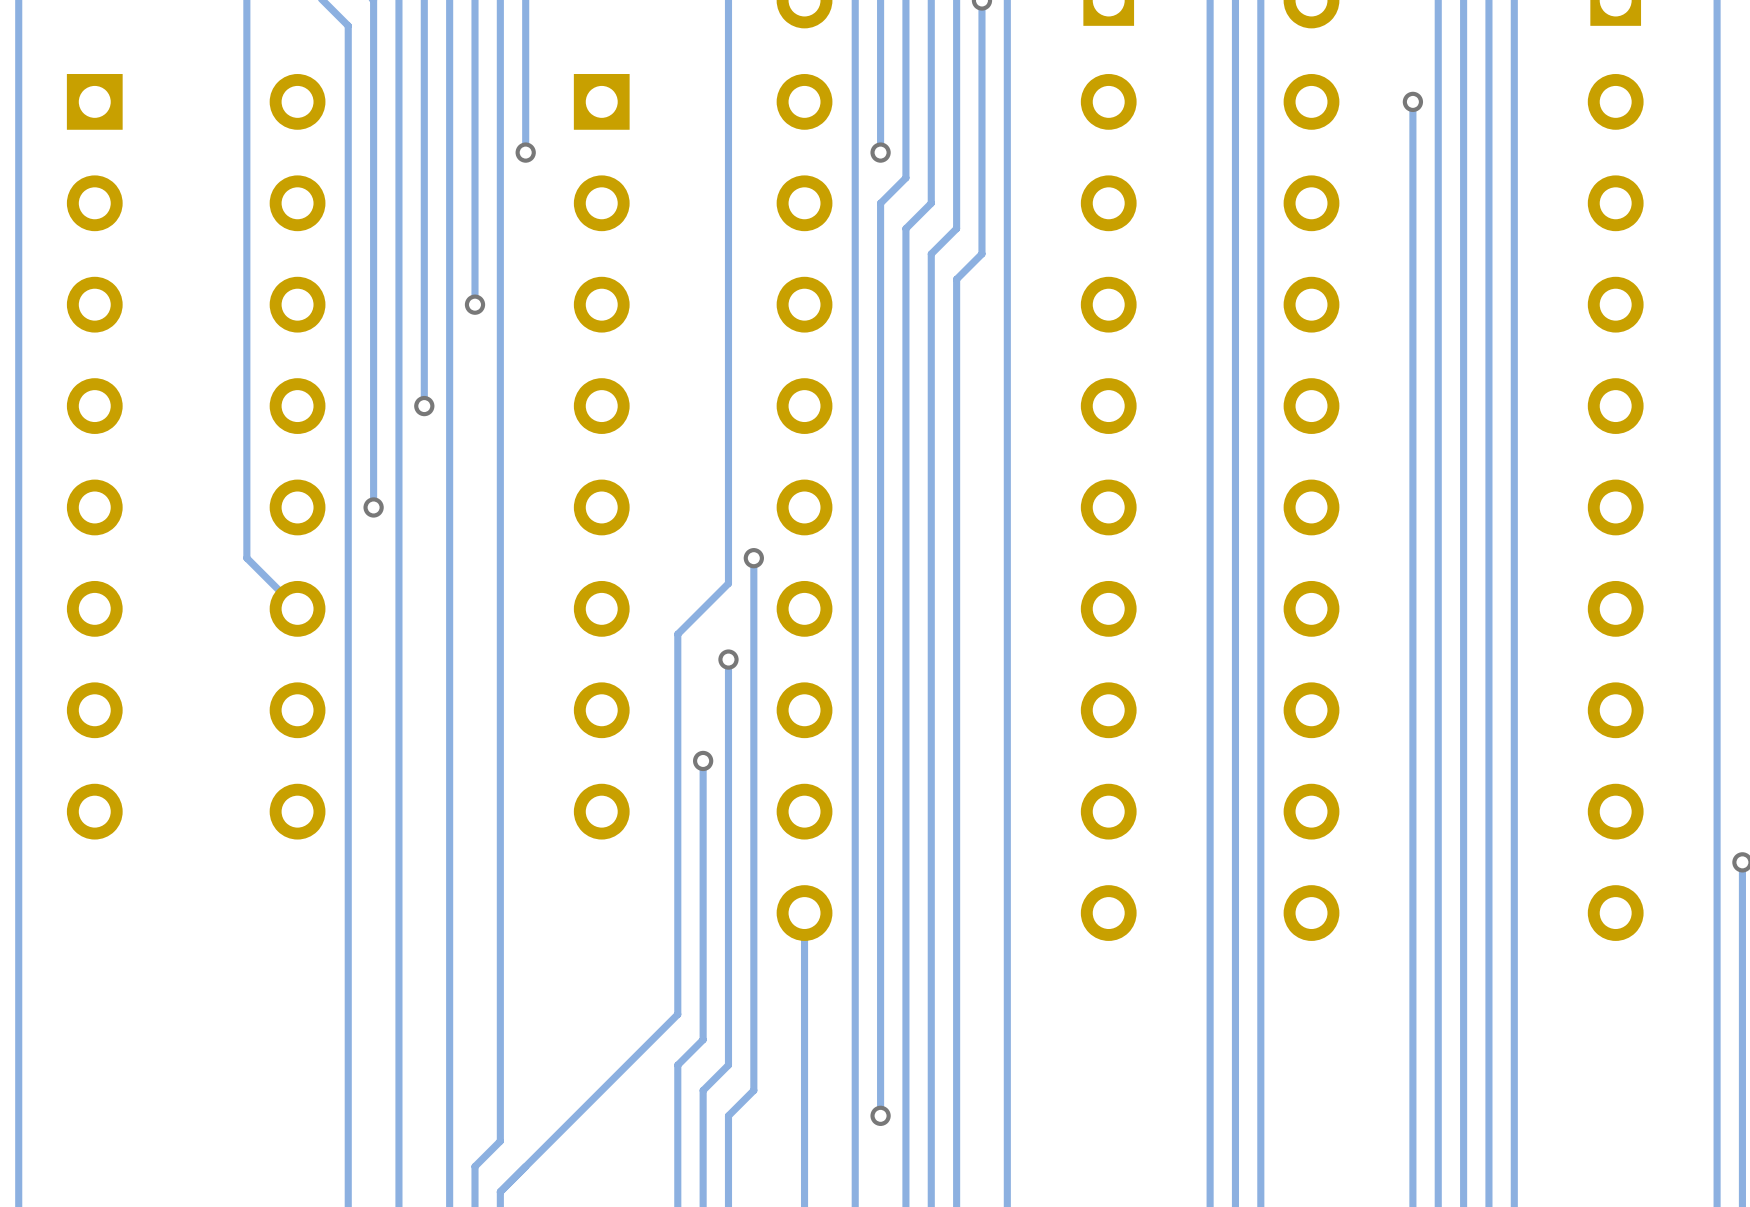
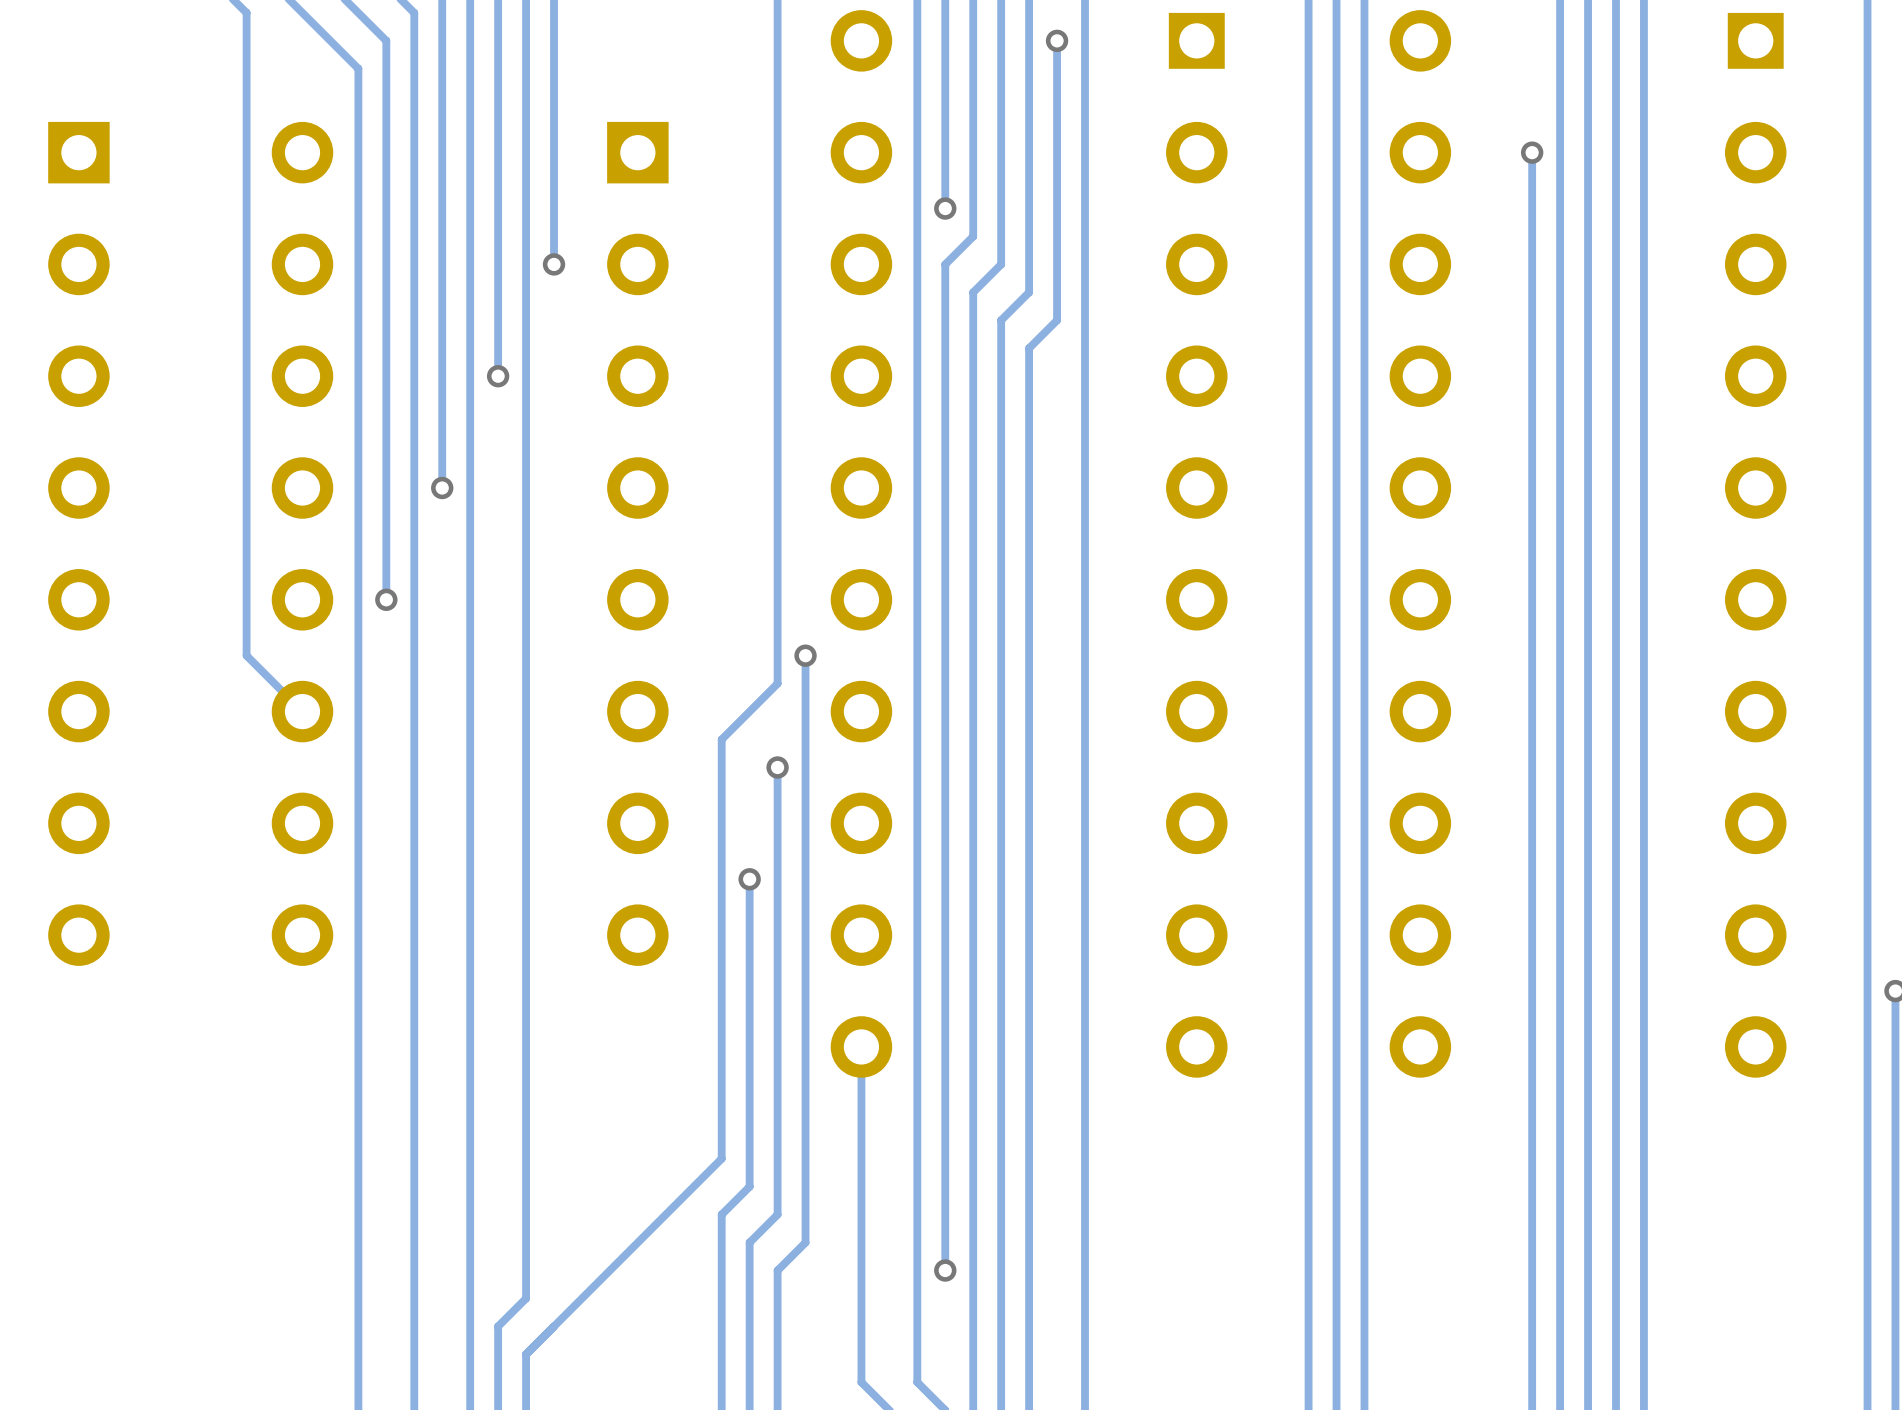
track: none -> (554, 208) (554, 264)
via position: (525, 152) -> (554, 264)

